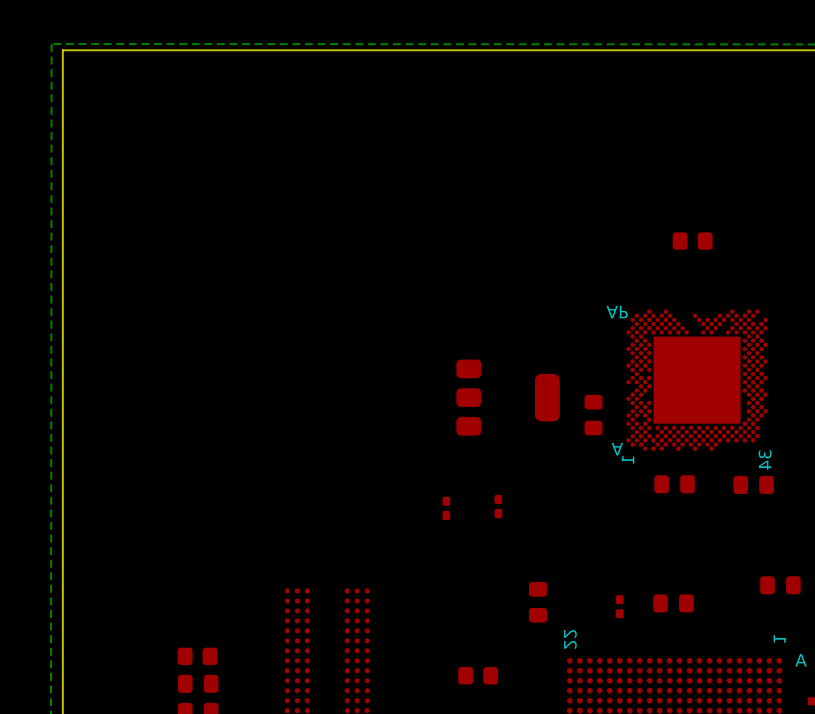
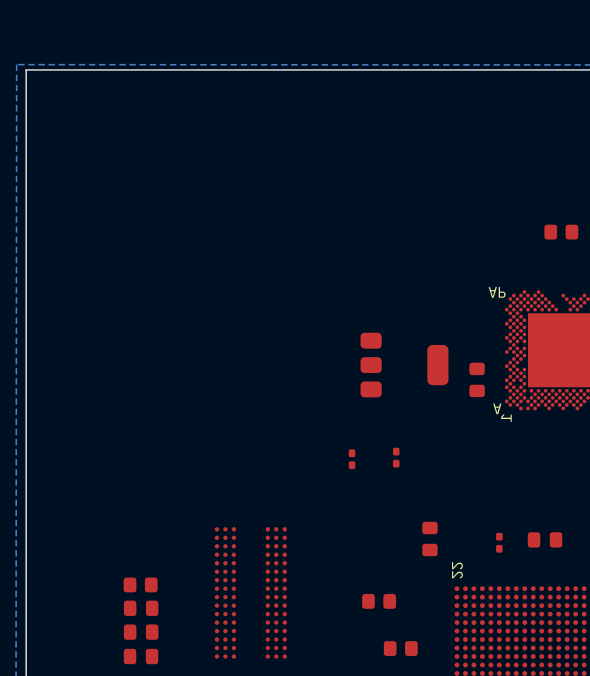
part: (674, 484) -> none

